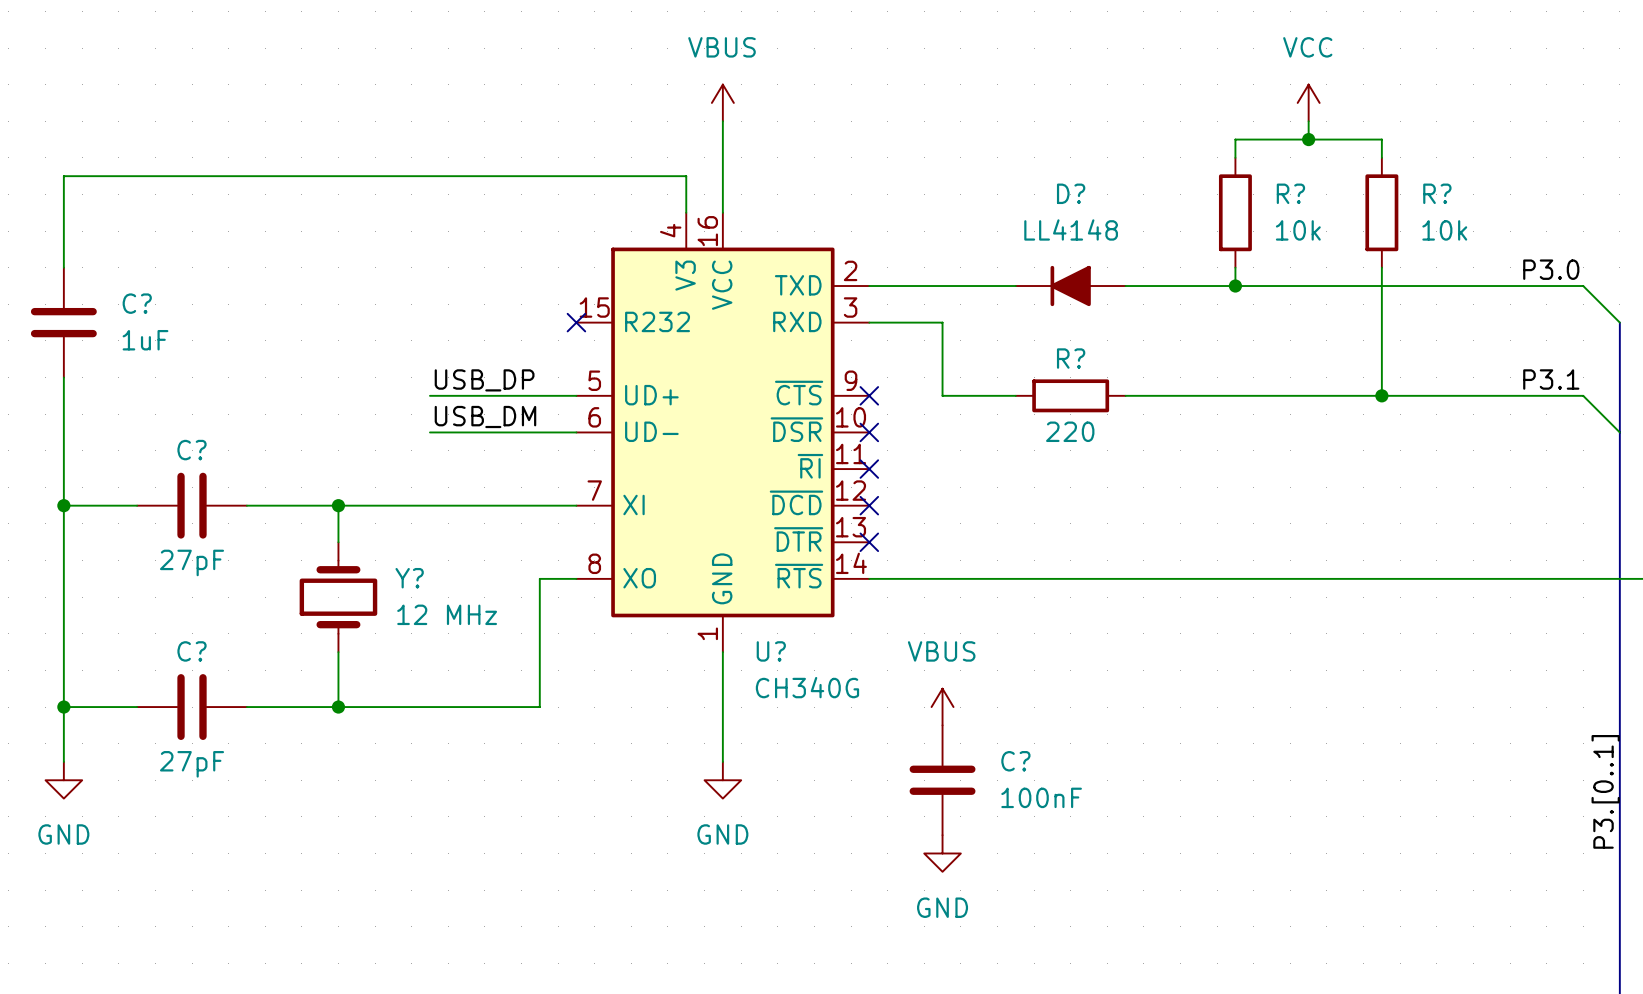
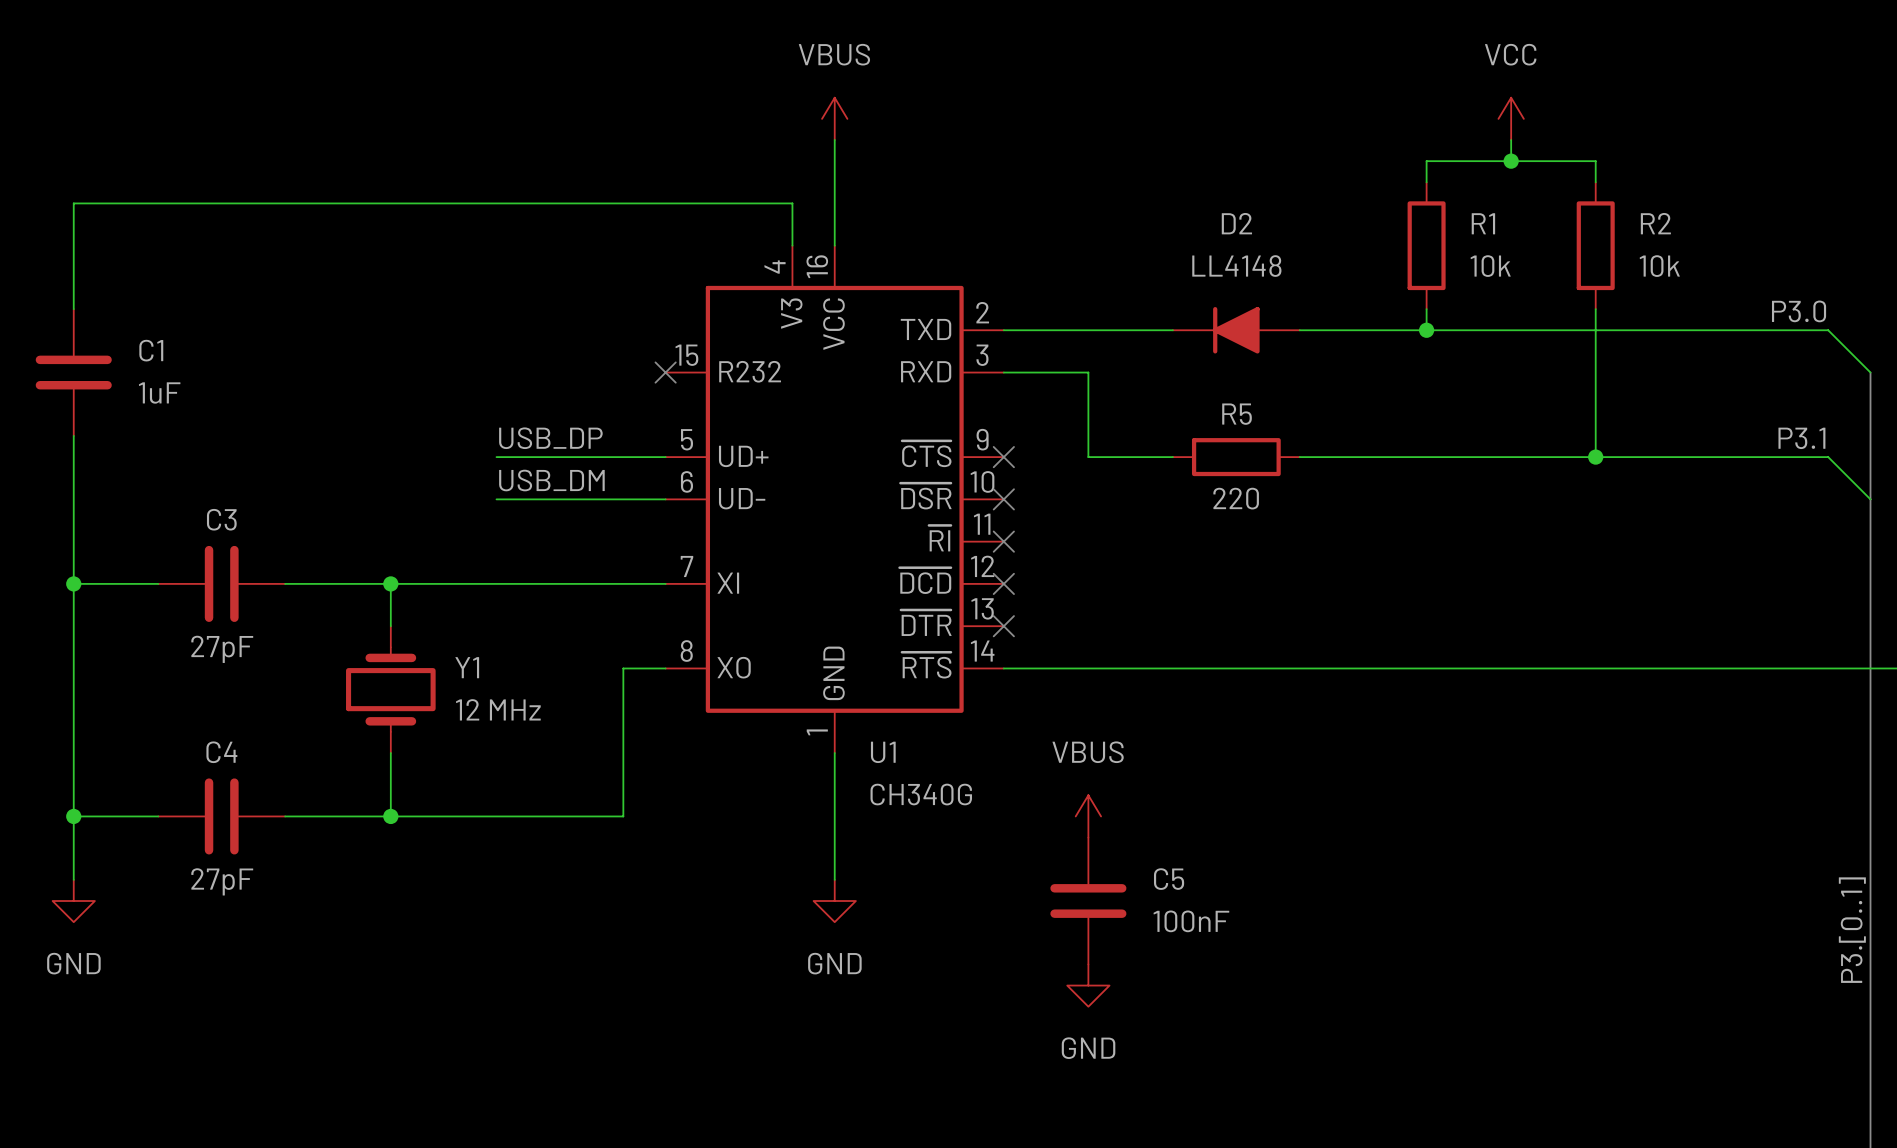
D? name: D? (1071, 193) -> D2 (1236, 223)
R? name: R? (1290, 193) -> R1 (1483, 223)
R? name: R? (1437, 193) -> R2 (1655, 223)
C? name: C? (137, 303) -> C1 (151, 350)
R? name: R? (1071, 358) -> R5 (1237, 414)
C? name: C? (192, 450) -> C3 (221, 519)
Y? name: Y? (409, 578) -> Y1 (467, 667)
C? name: C? (192, 651) -> C4 (221, 752)
U? name: U? (771, 651) -> U1 (883, 752)
C? name: C? (1015, 761) -> C5 (1169, 879)

